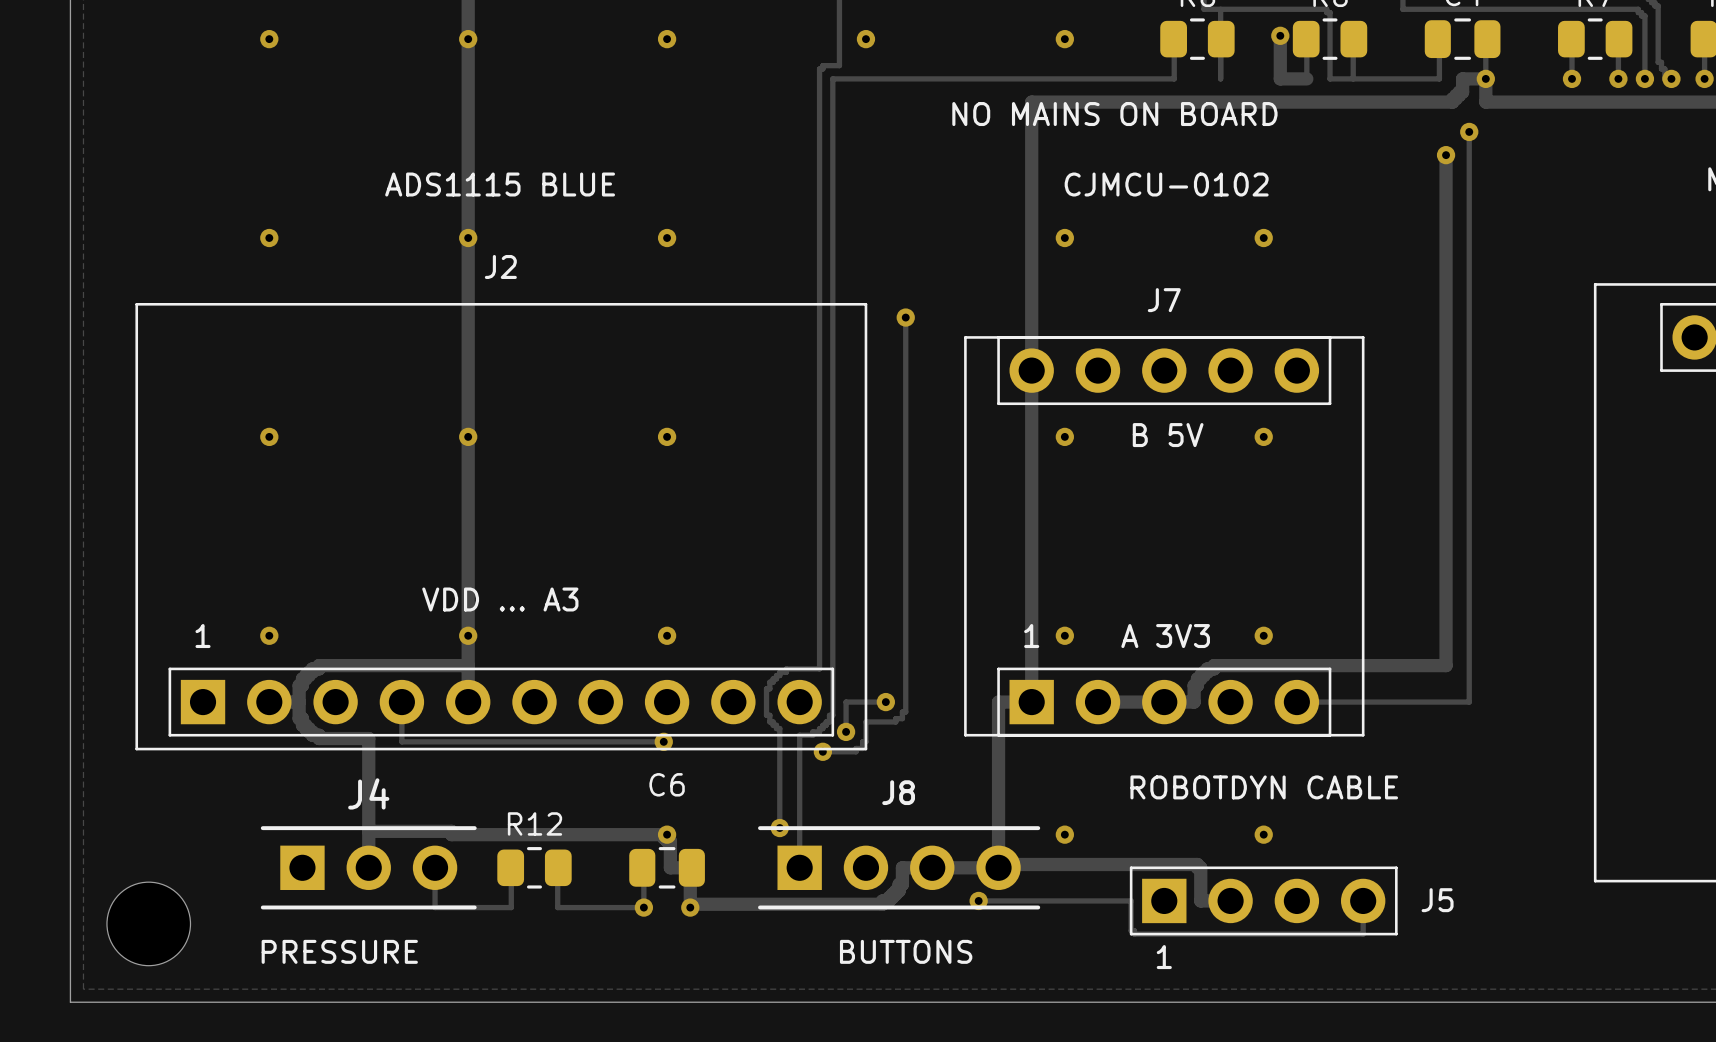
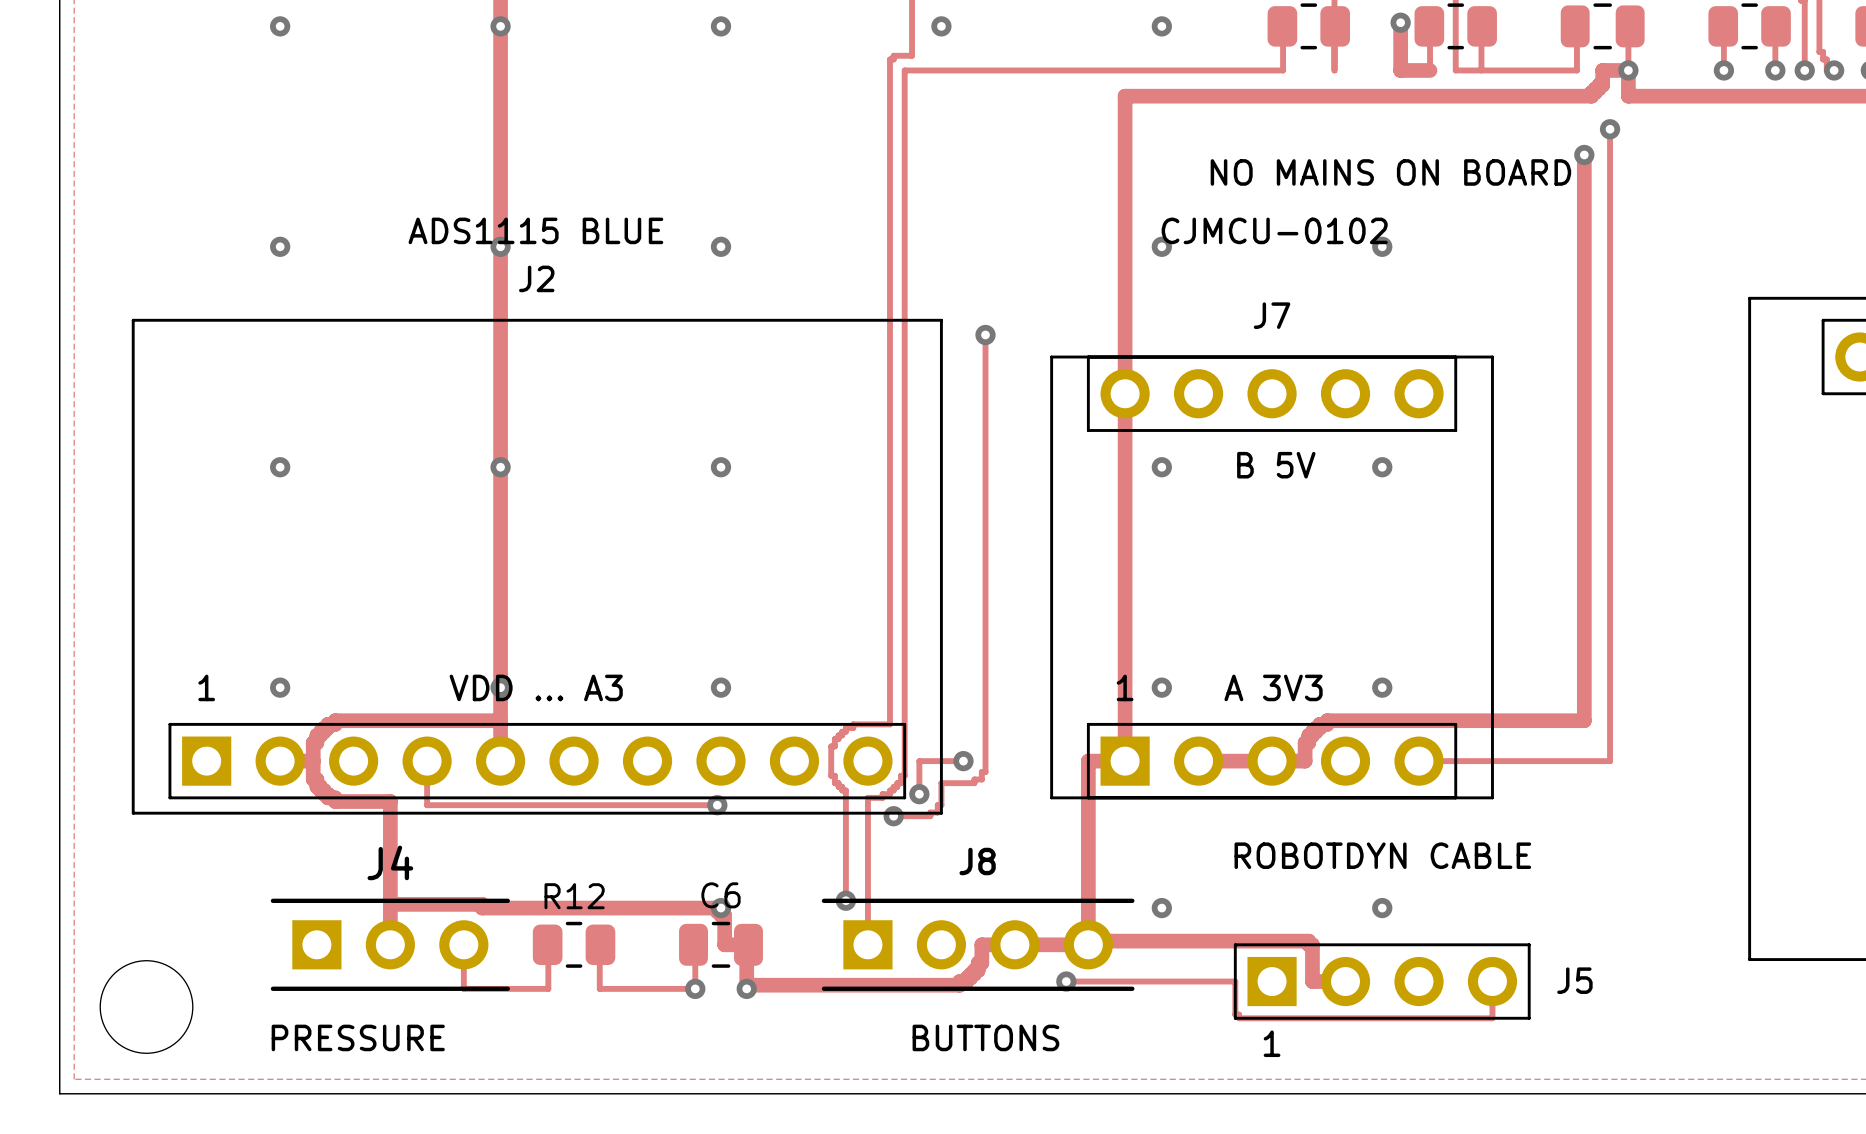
text position: NO MAINS ON BOARD (1114, 114) -> NO MAINS ON BOARD (1390, 172)
text position: ADS1115 BLUE (500, 184) -> ADS1115 BLUE (535, 230)
text position: CJMCU-0102 (1166, 184) -> CJMCU-0102 (1274, 230)
J2 text position: VDD ... A3 (500, 599) -> VDD ... A3 (536, 687)
C6 name position: C6 (667, 784) -> C6 (721, 895)

